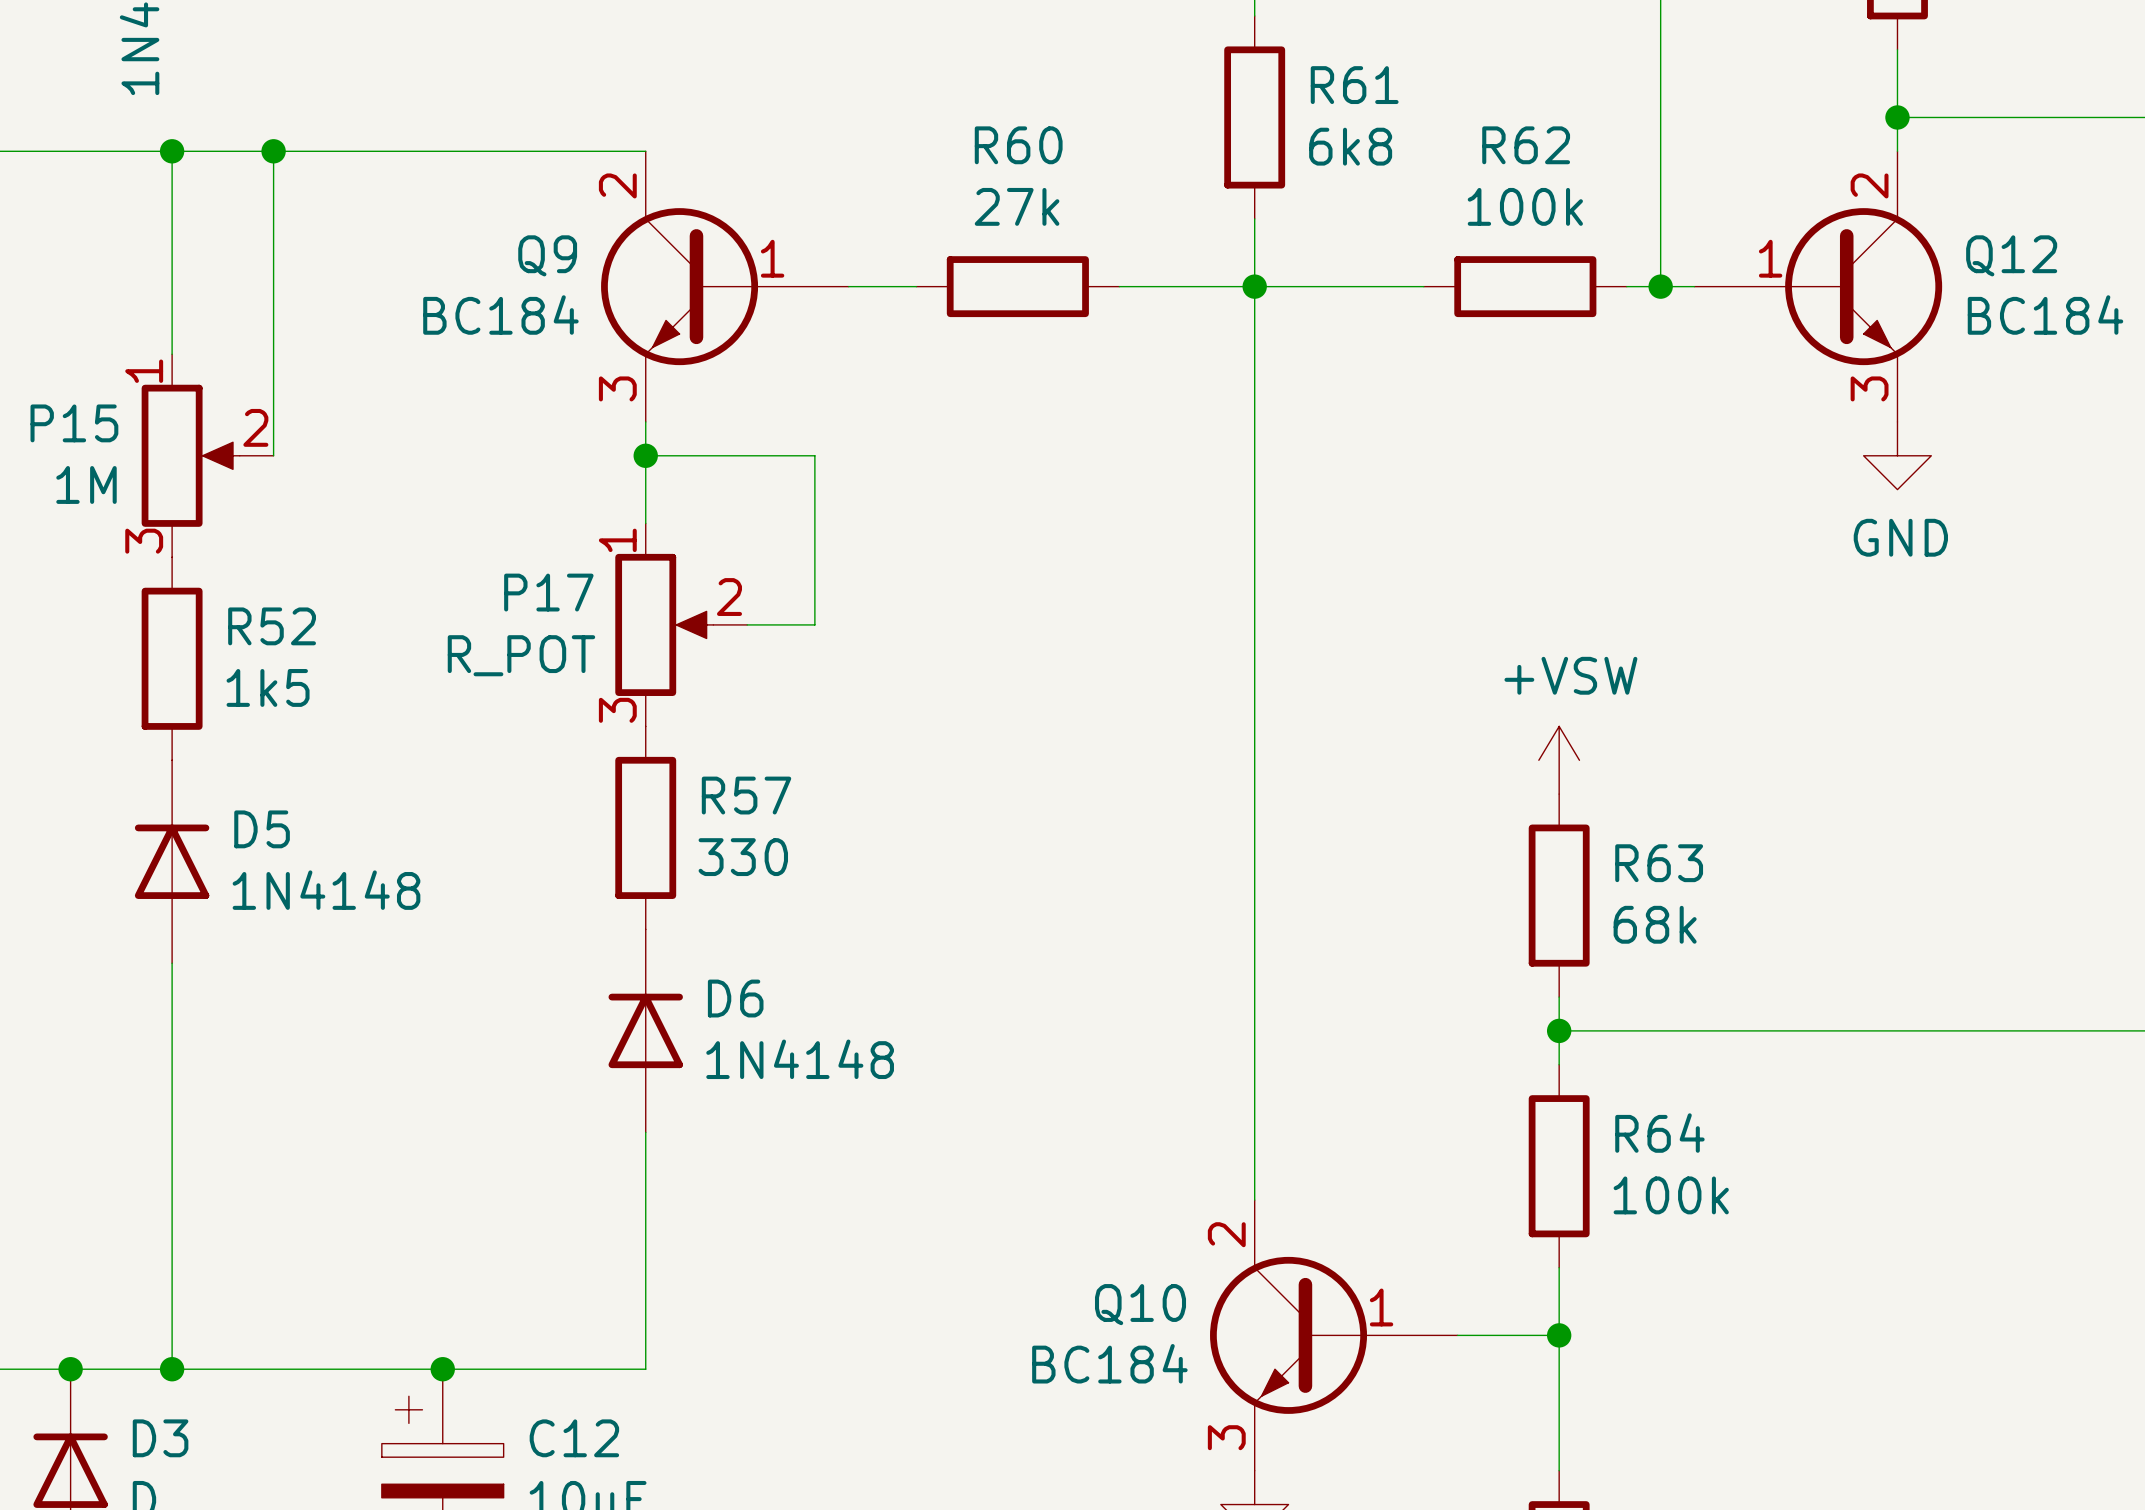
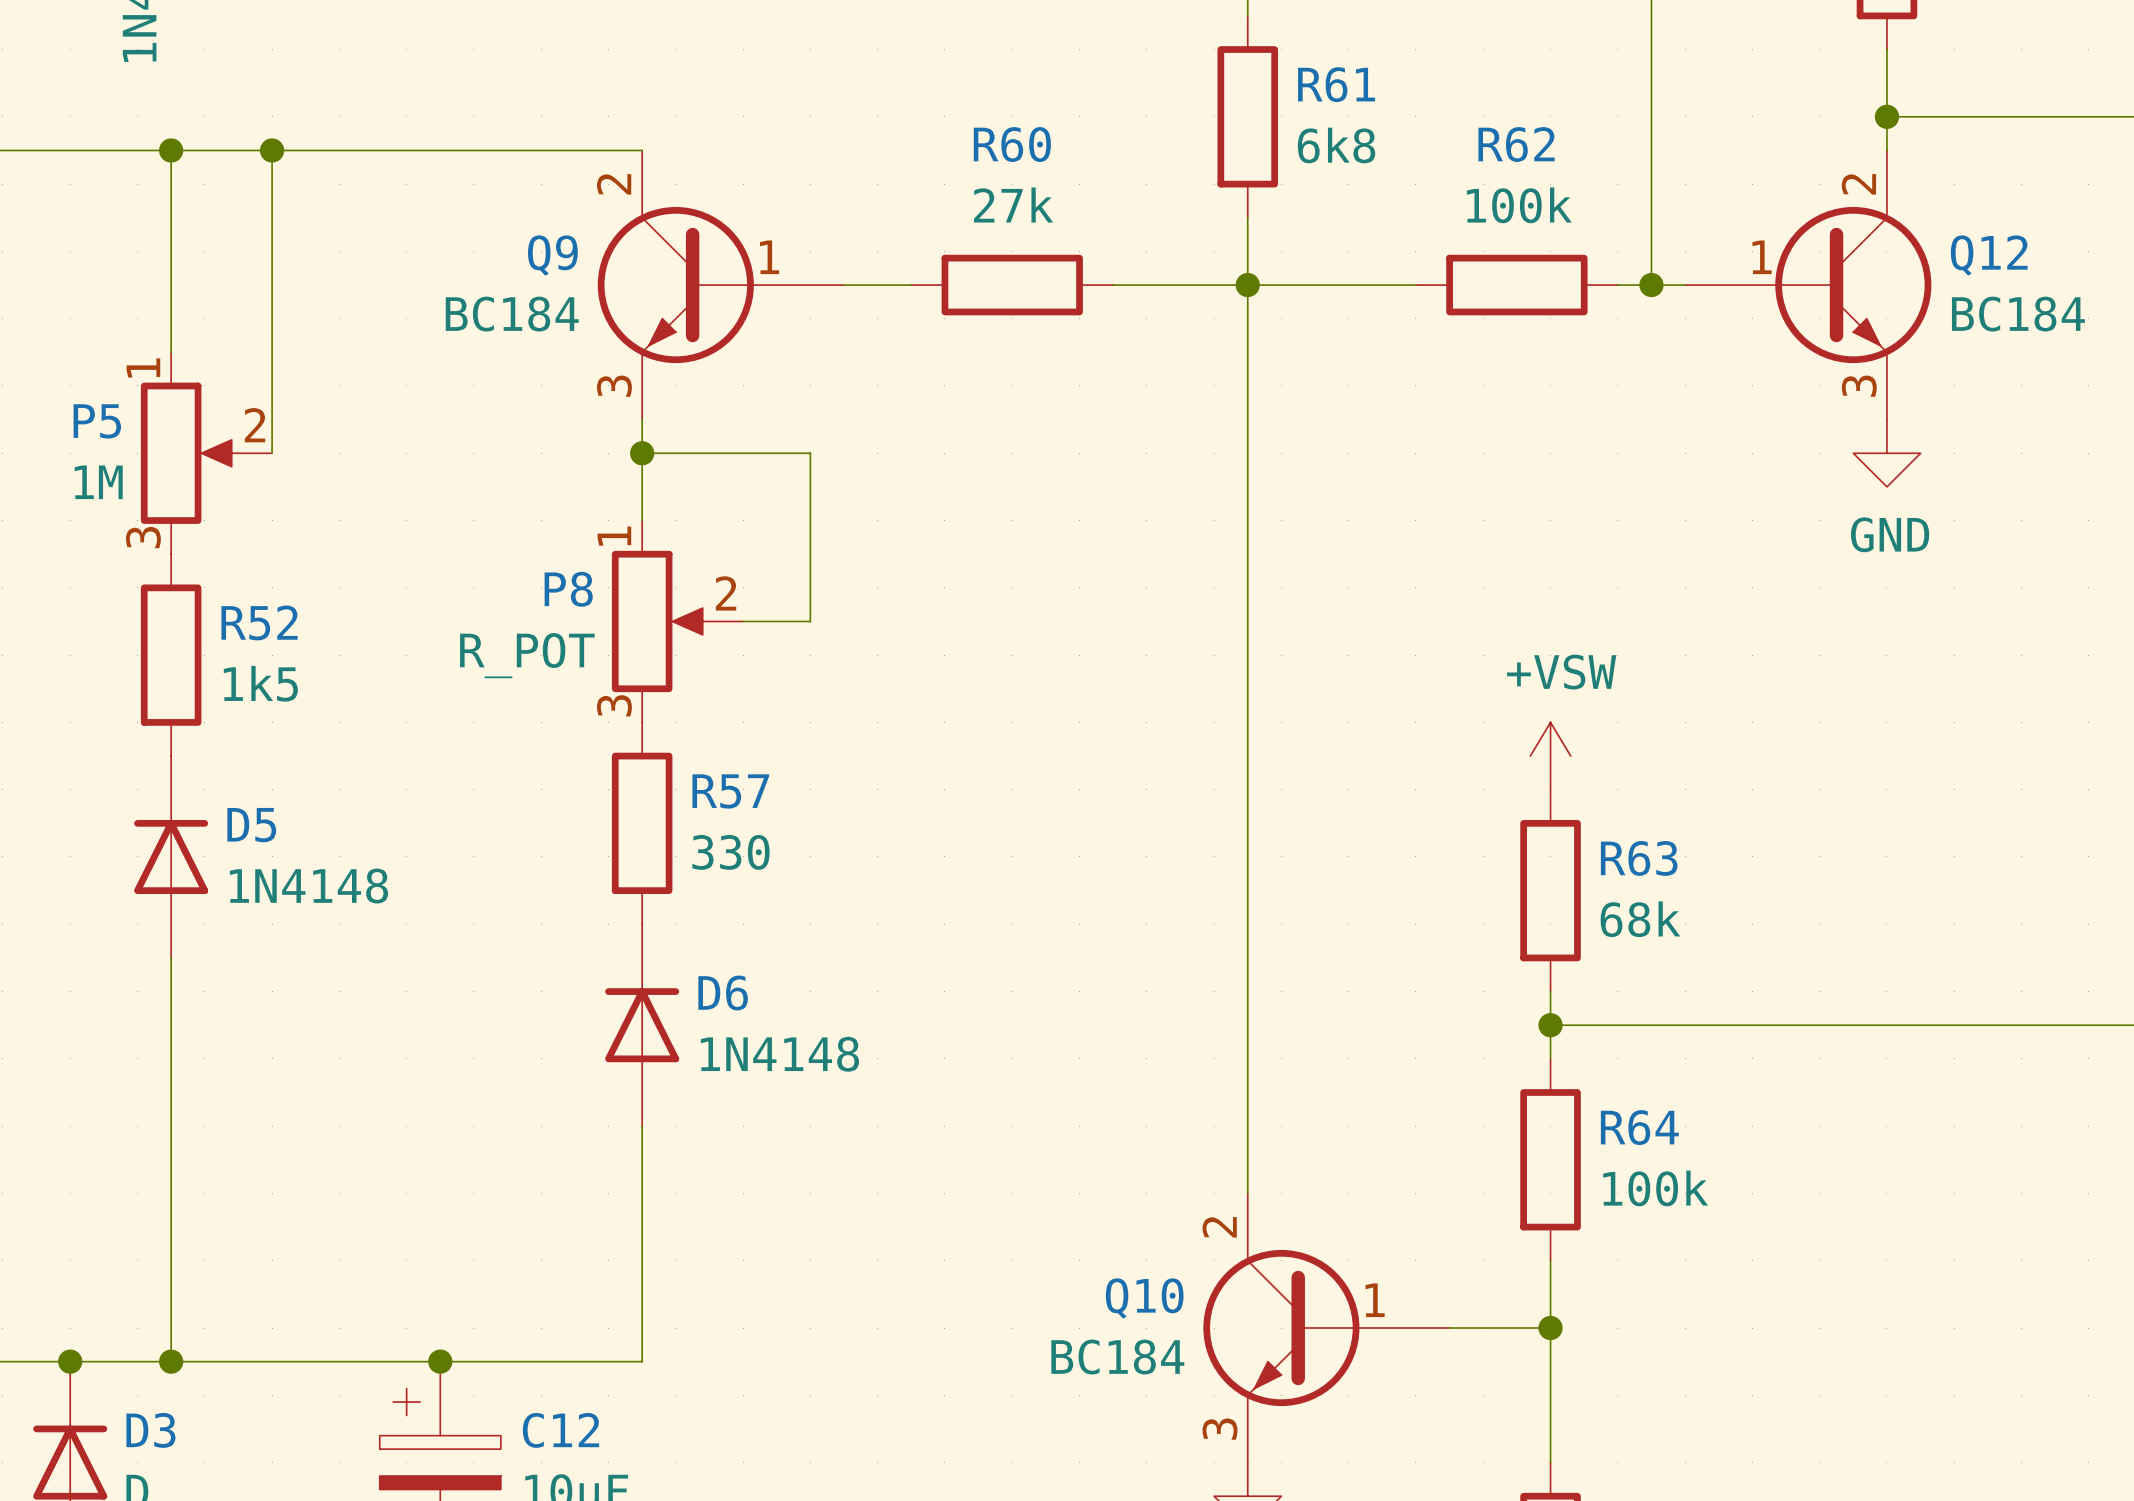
P15 name: P15 (74, 423) -> P5 (97, 421)
P17 name: P17 (548, 592) -> P8 (568, 589)

